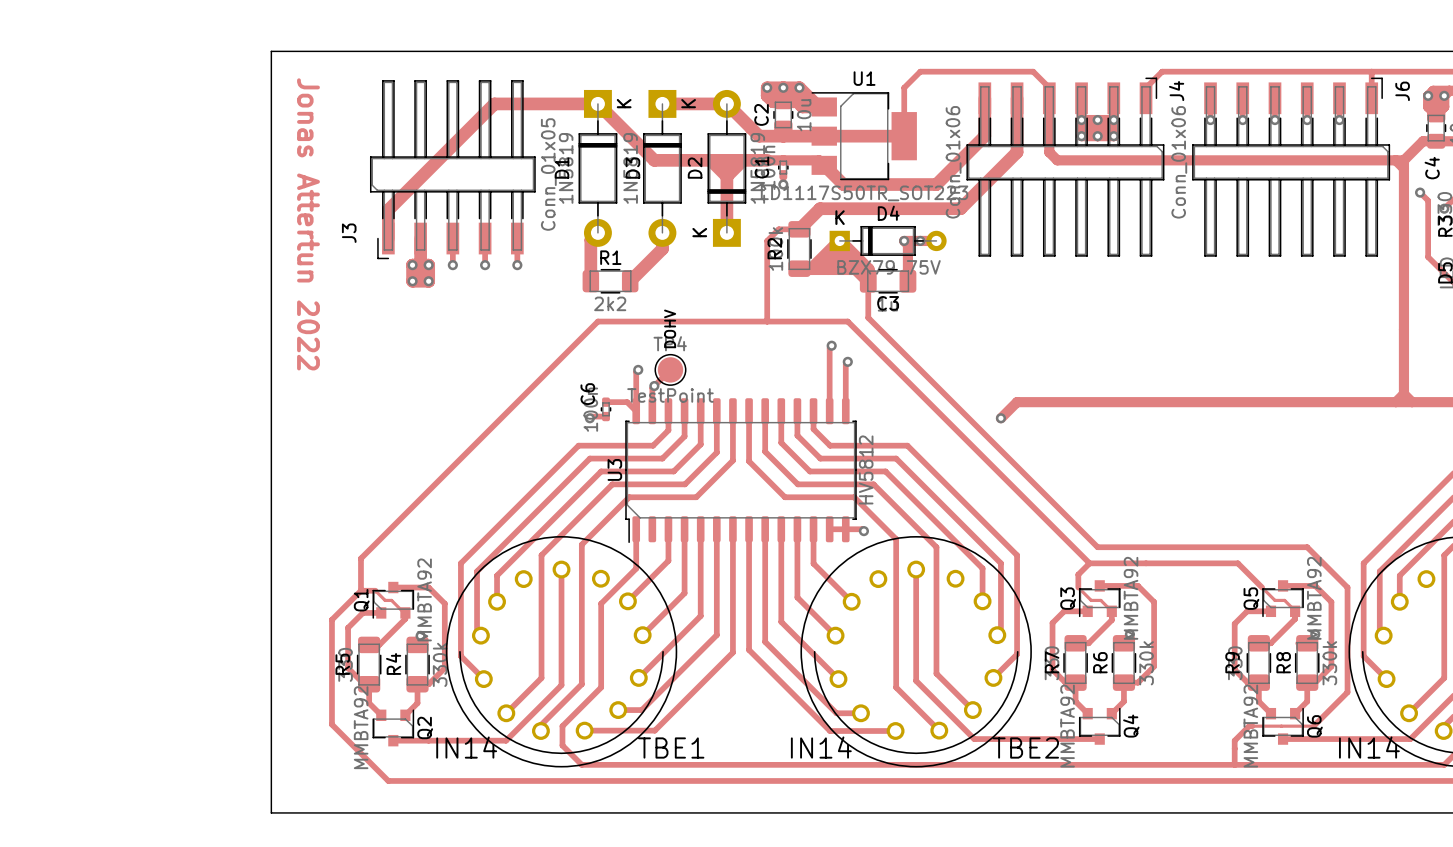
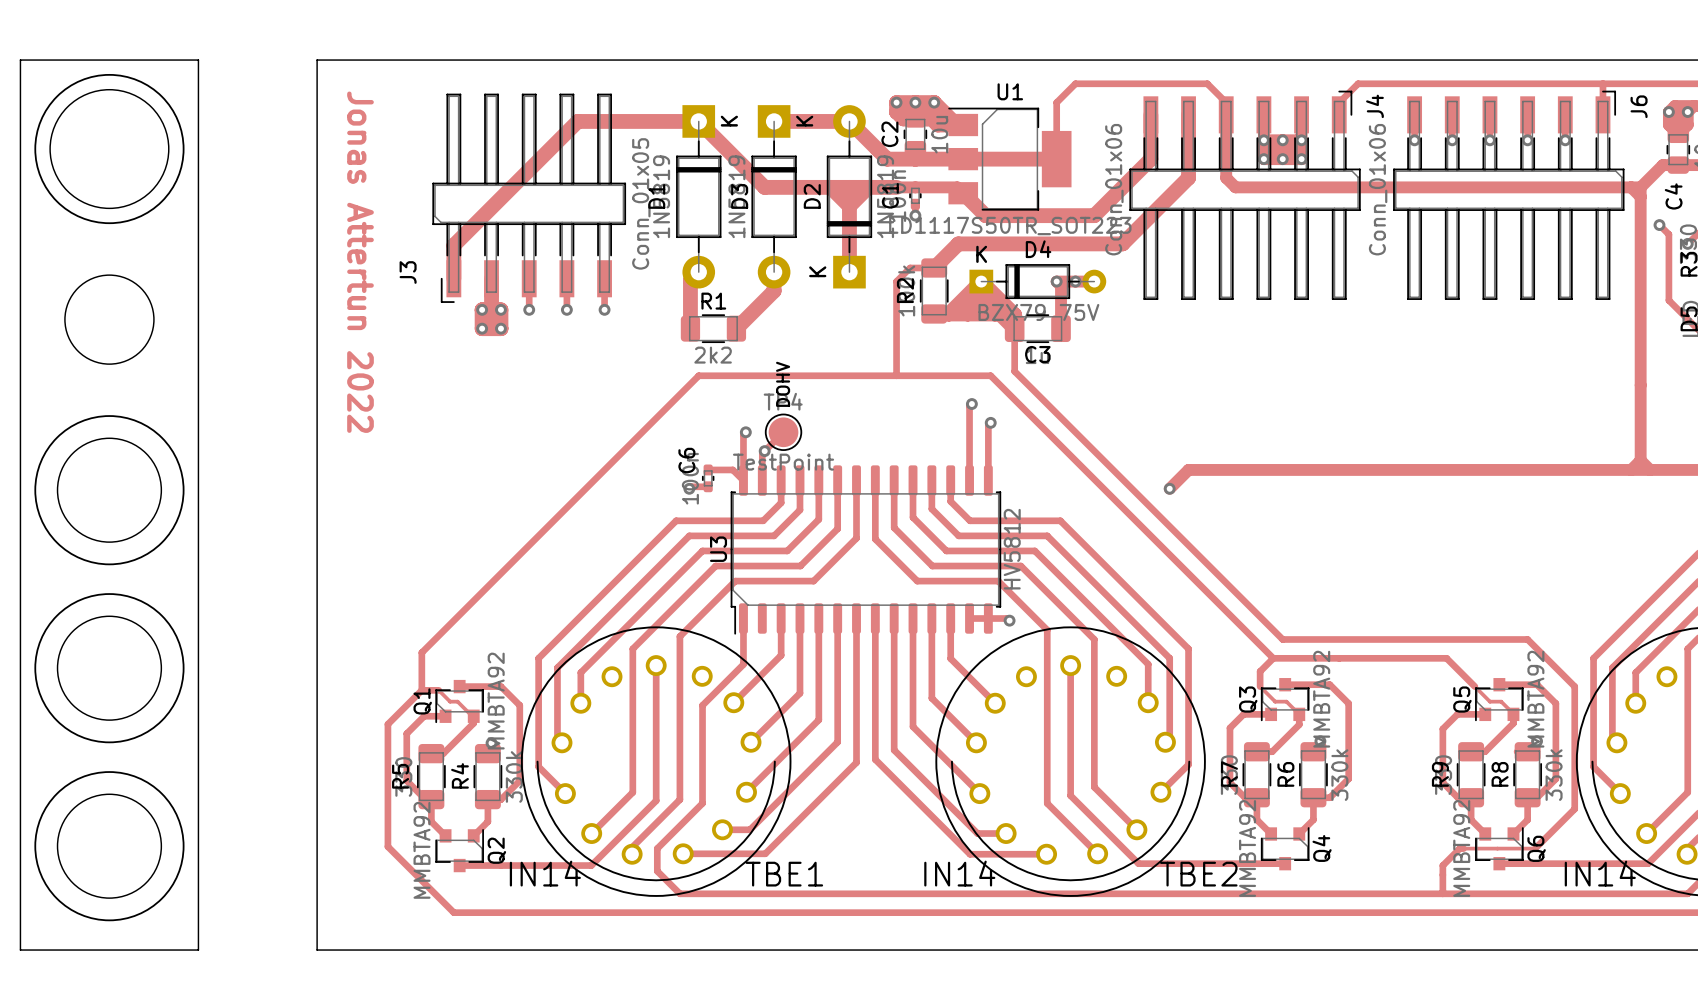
board edge: none -> (20, 60) (198, 60) (198, 950) (20, 950) (20, 60)
drawing: none -> [34, 73, 185, 225]
round board edge: none -> [49, 89, 170, 209]
round board edge: none -> [64, 274, 155, 365]
drawing: none -> [34, 415, 185, 566]
round board edge: none -> [57, 437, 162, 543]
drawing: none -> [34, 593, 185, 744]
round board edge: none -> [57, 615, 162, 721]
drawing: none -> [34, 771, 185, 922]
round board edge: none -> [57, 793, 162, 899]

